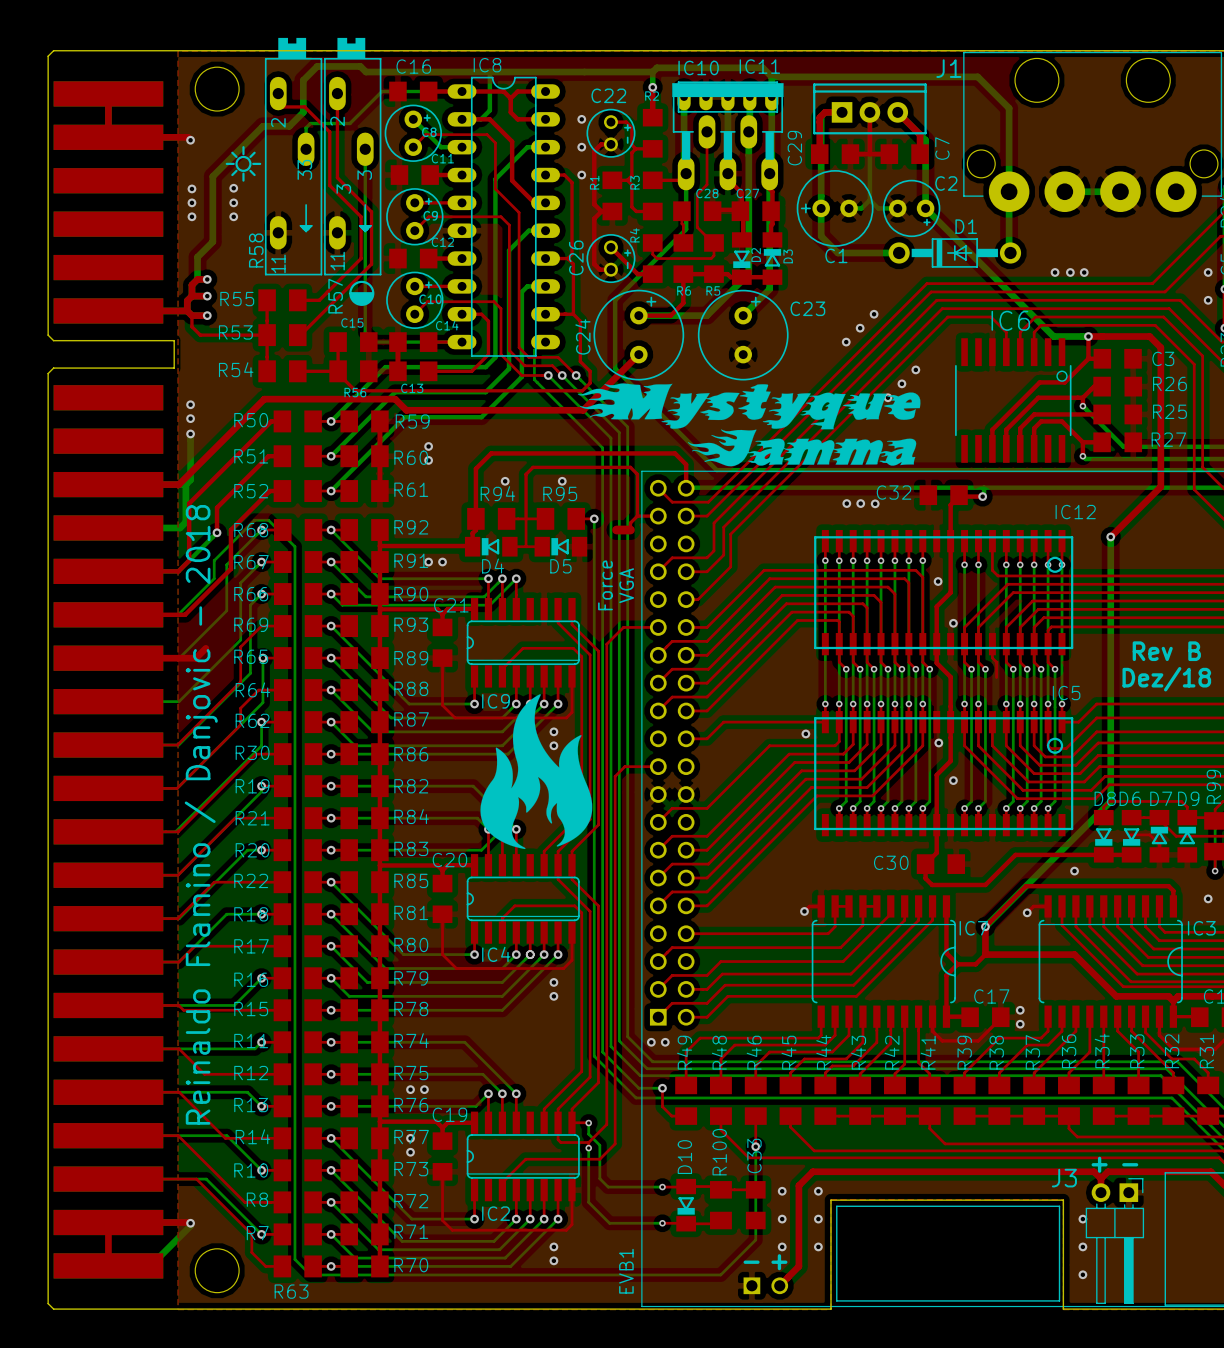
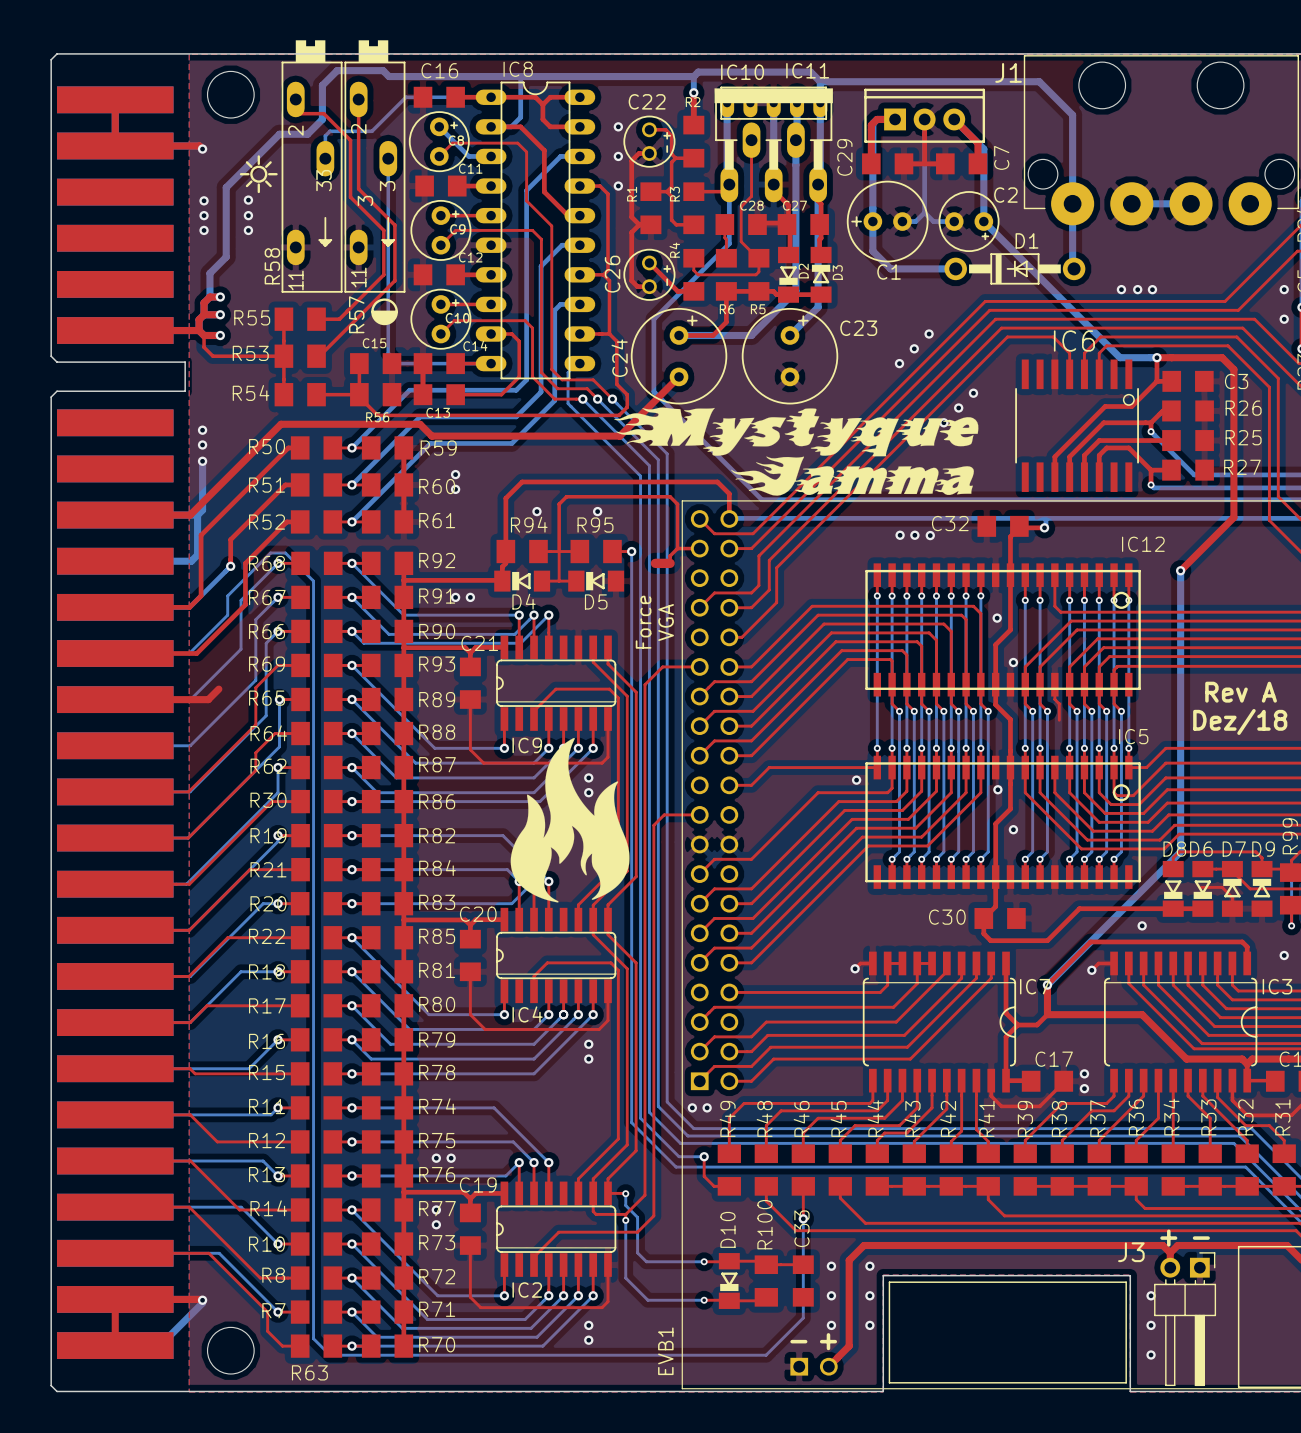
text: Rev B (1166, 651) -> Rev A (1241, 692)
text: Reinaldo Flamino / Danjovic - 2018 (201, 814) -> none

